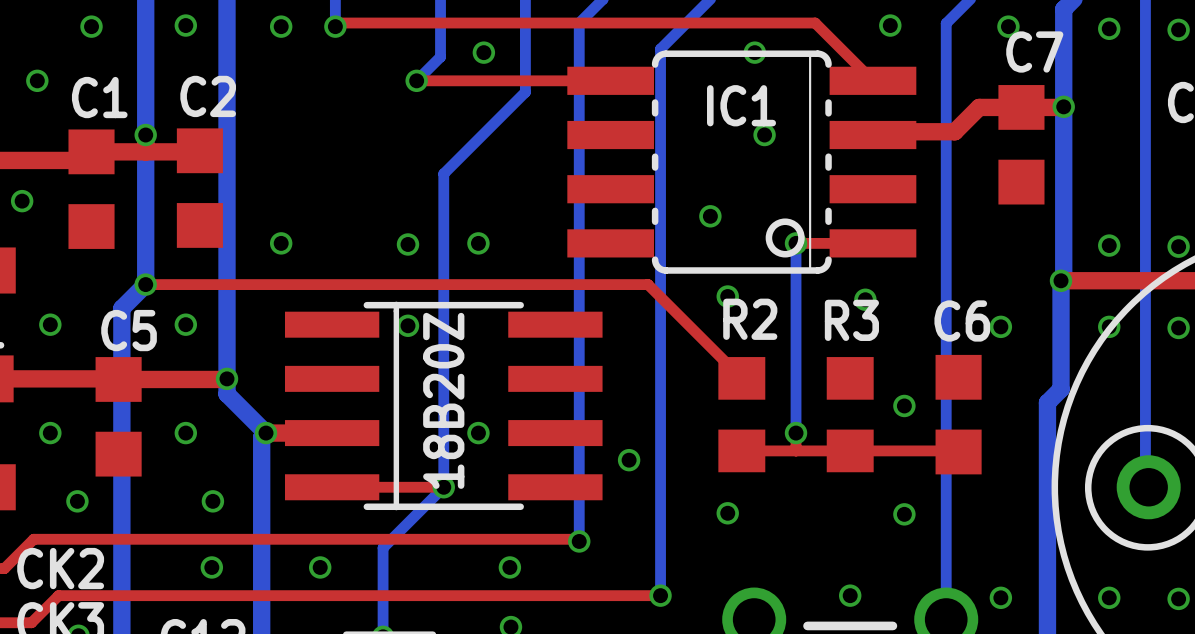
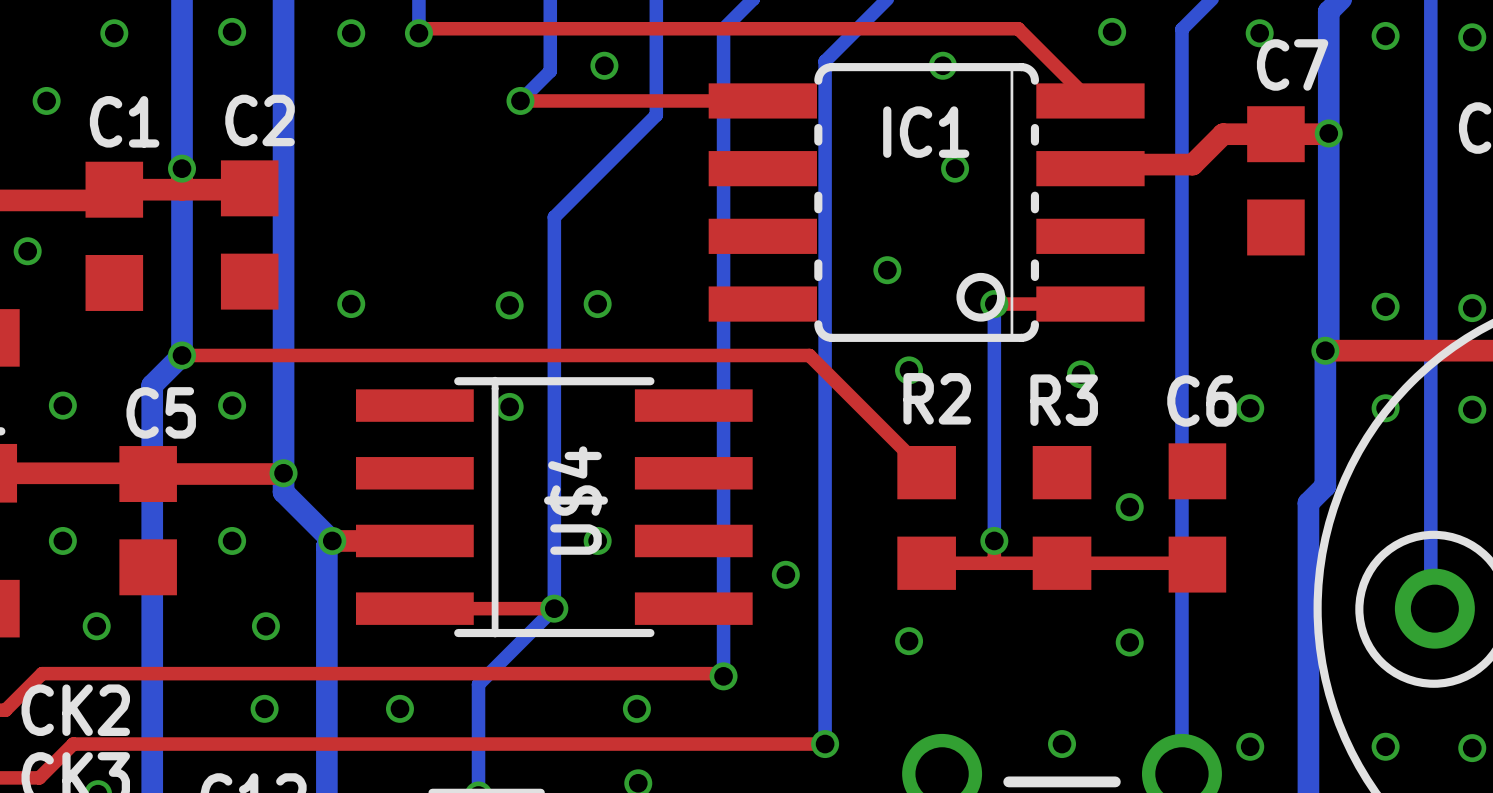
18B20Z name: 18B20Z (443, 400) -> U$4 (575, 500)

